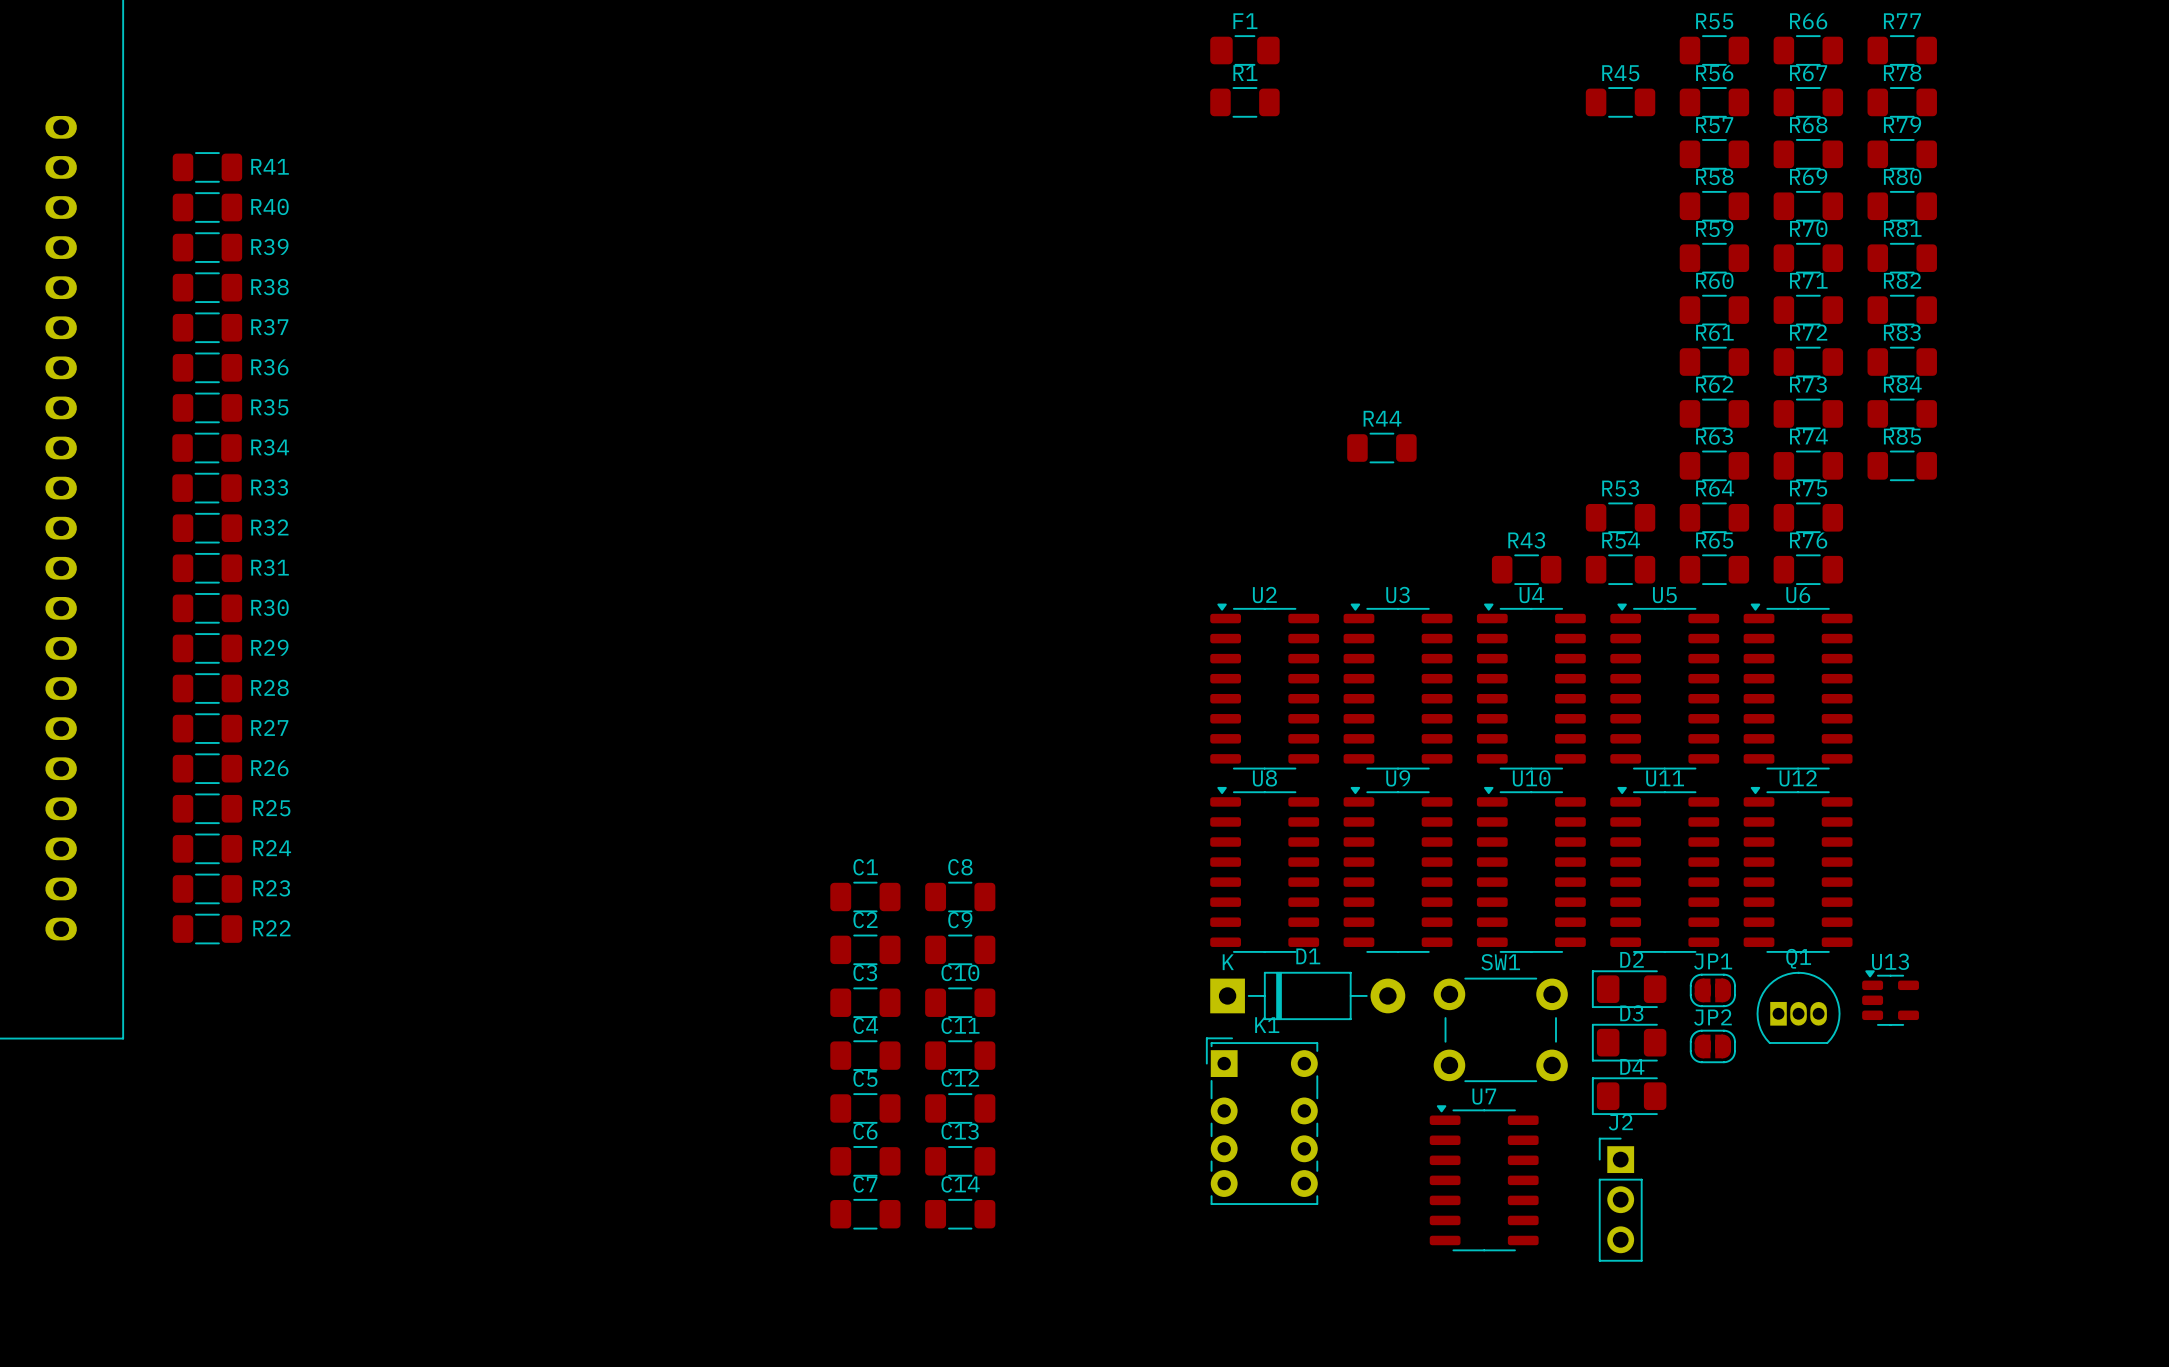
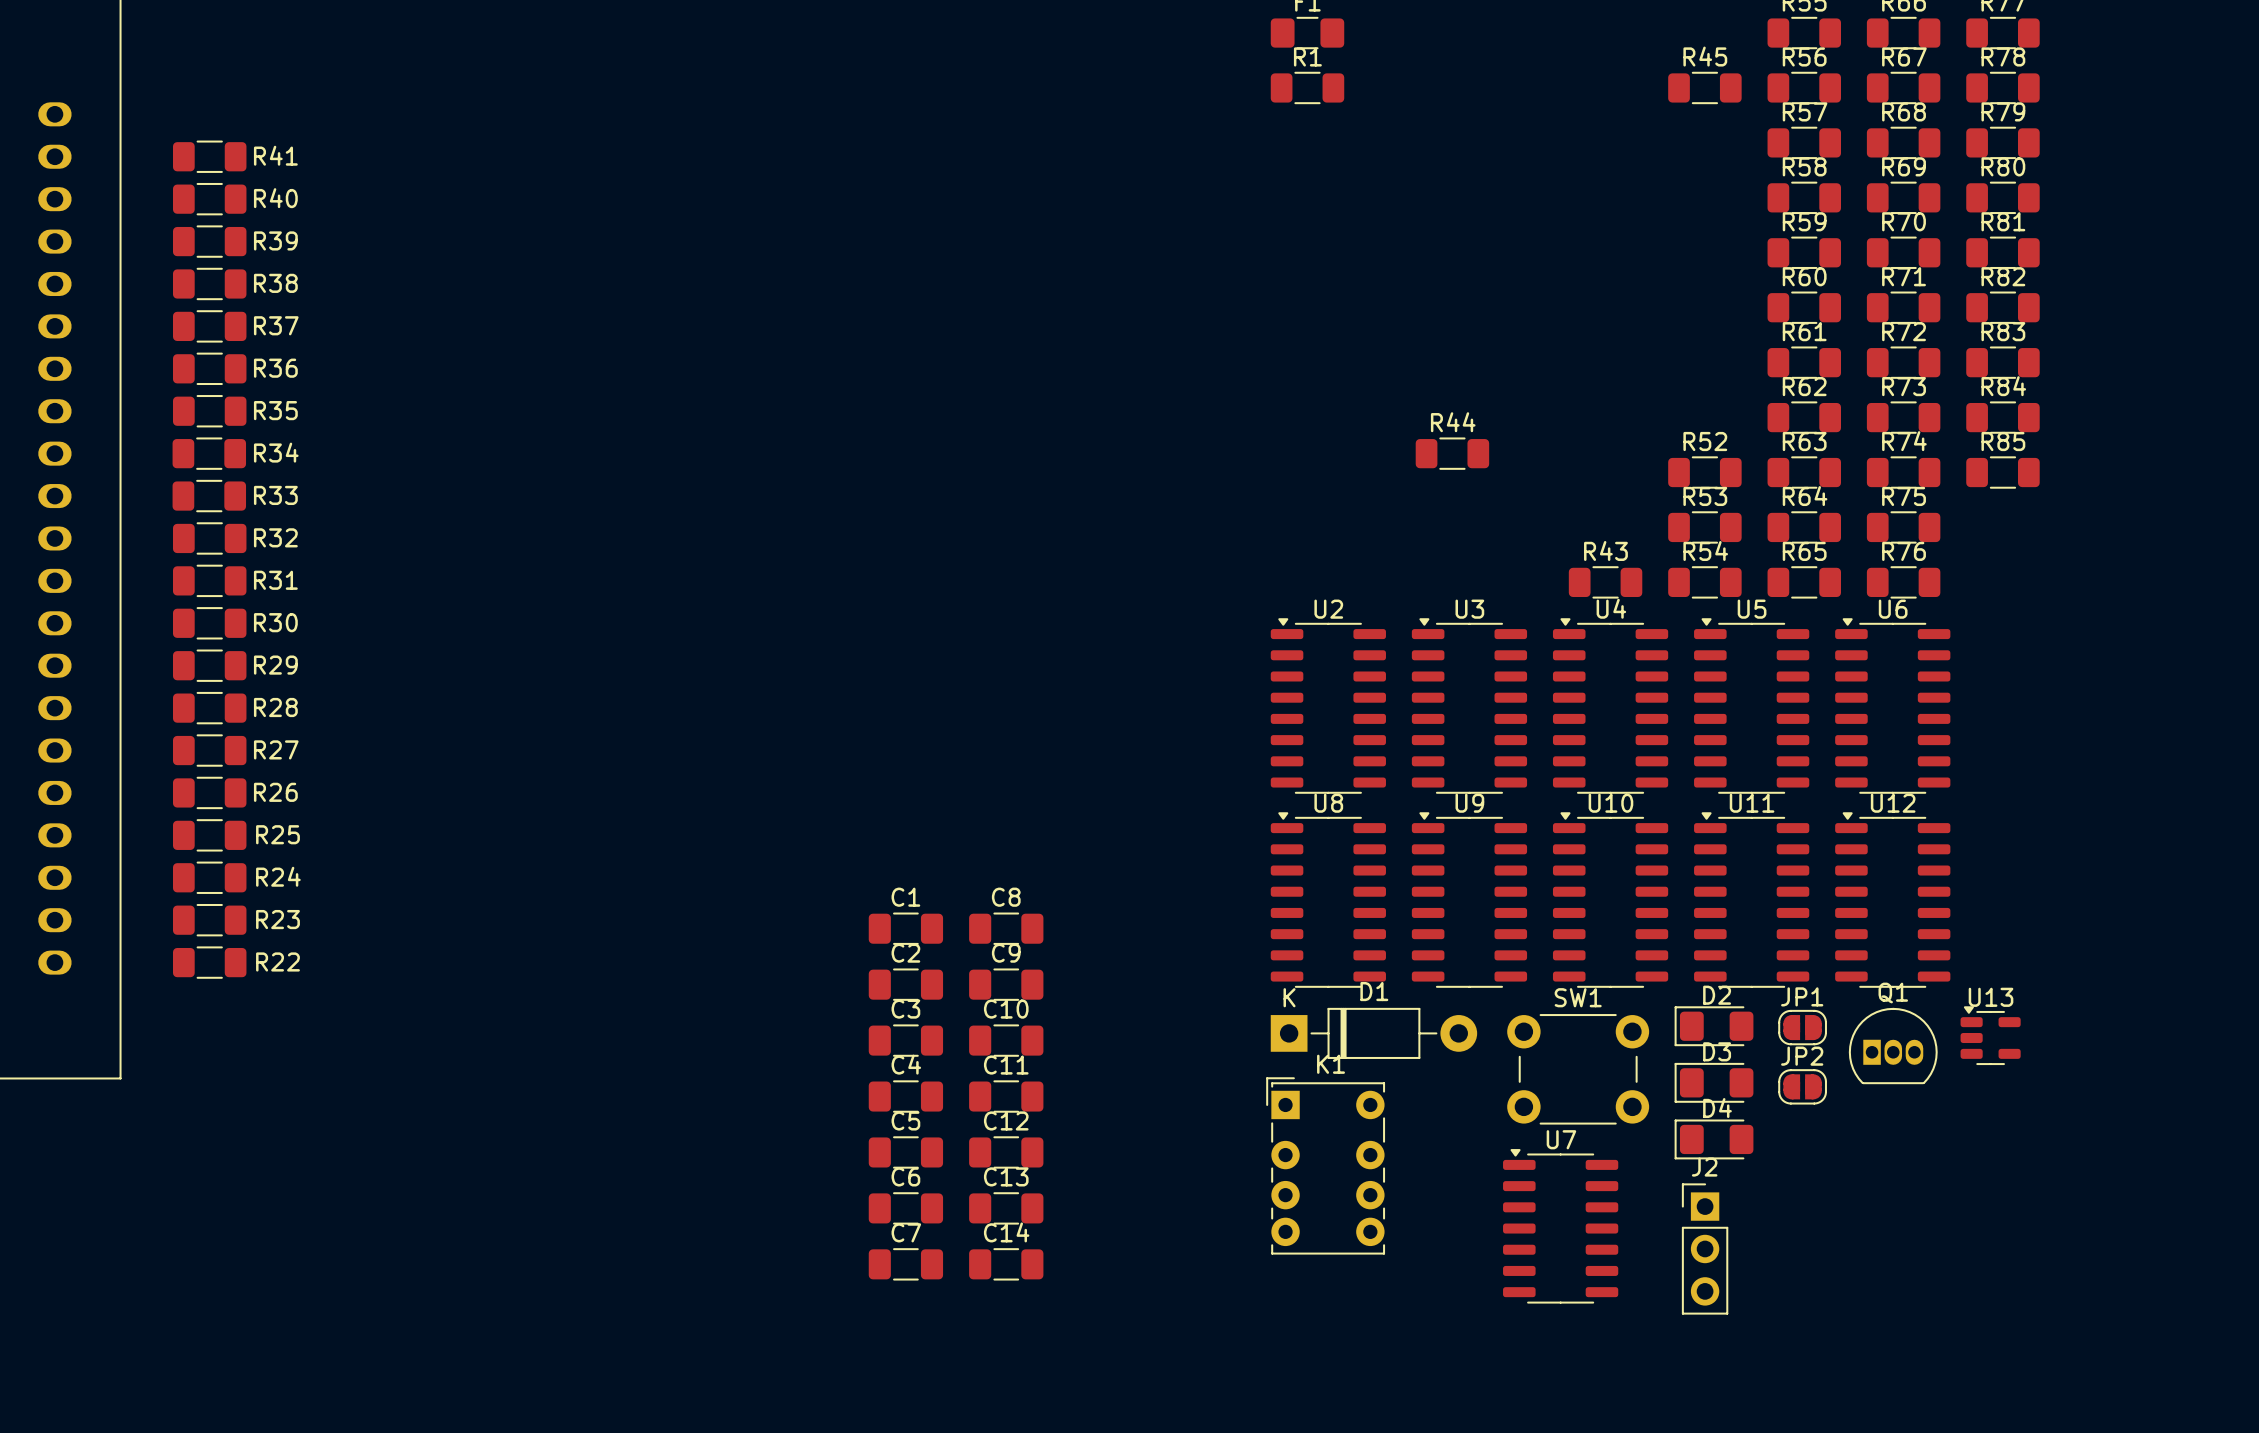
R52: none -> (1704, 472)

